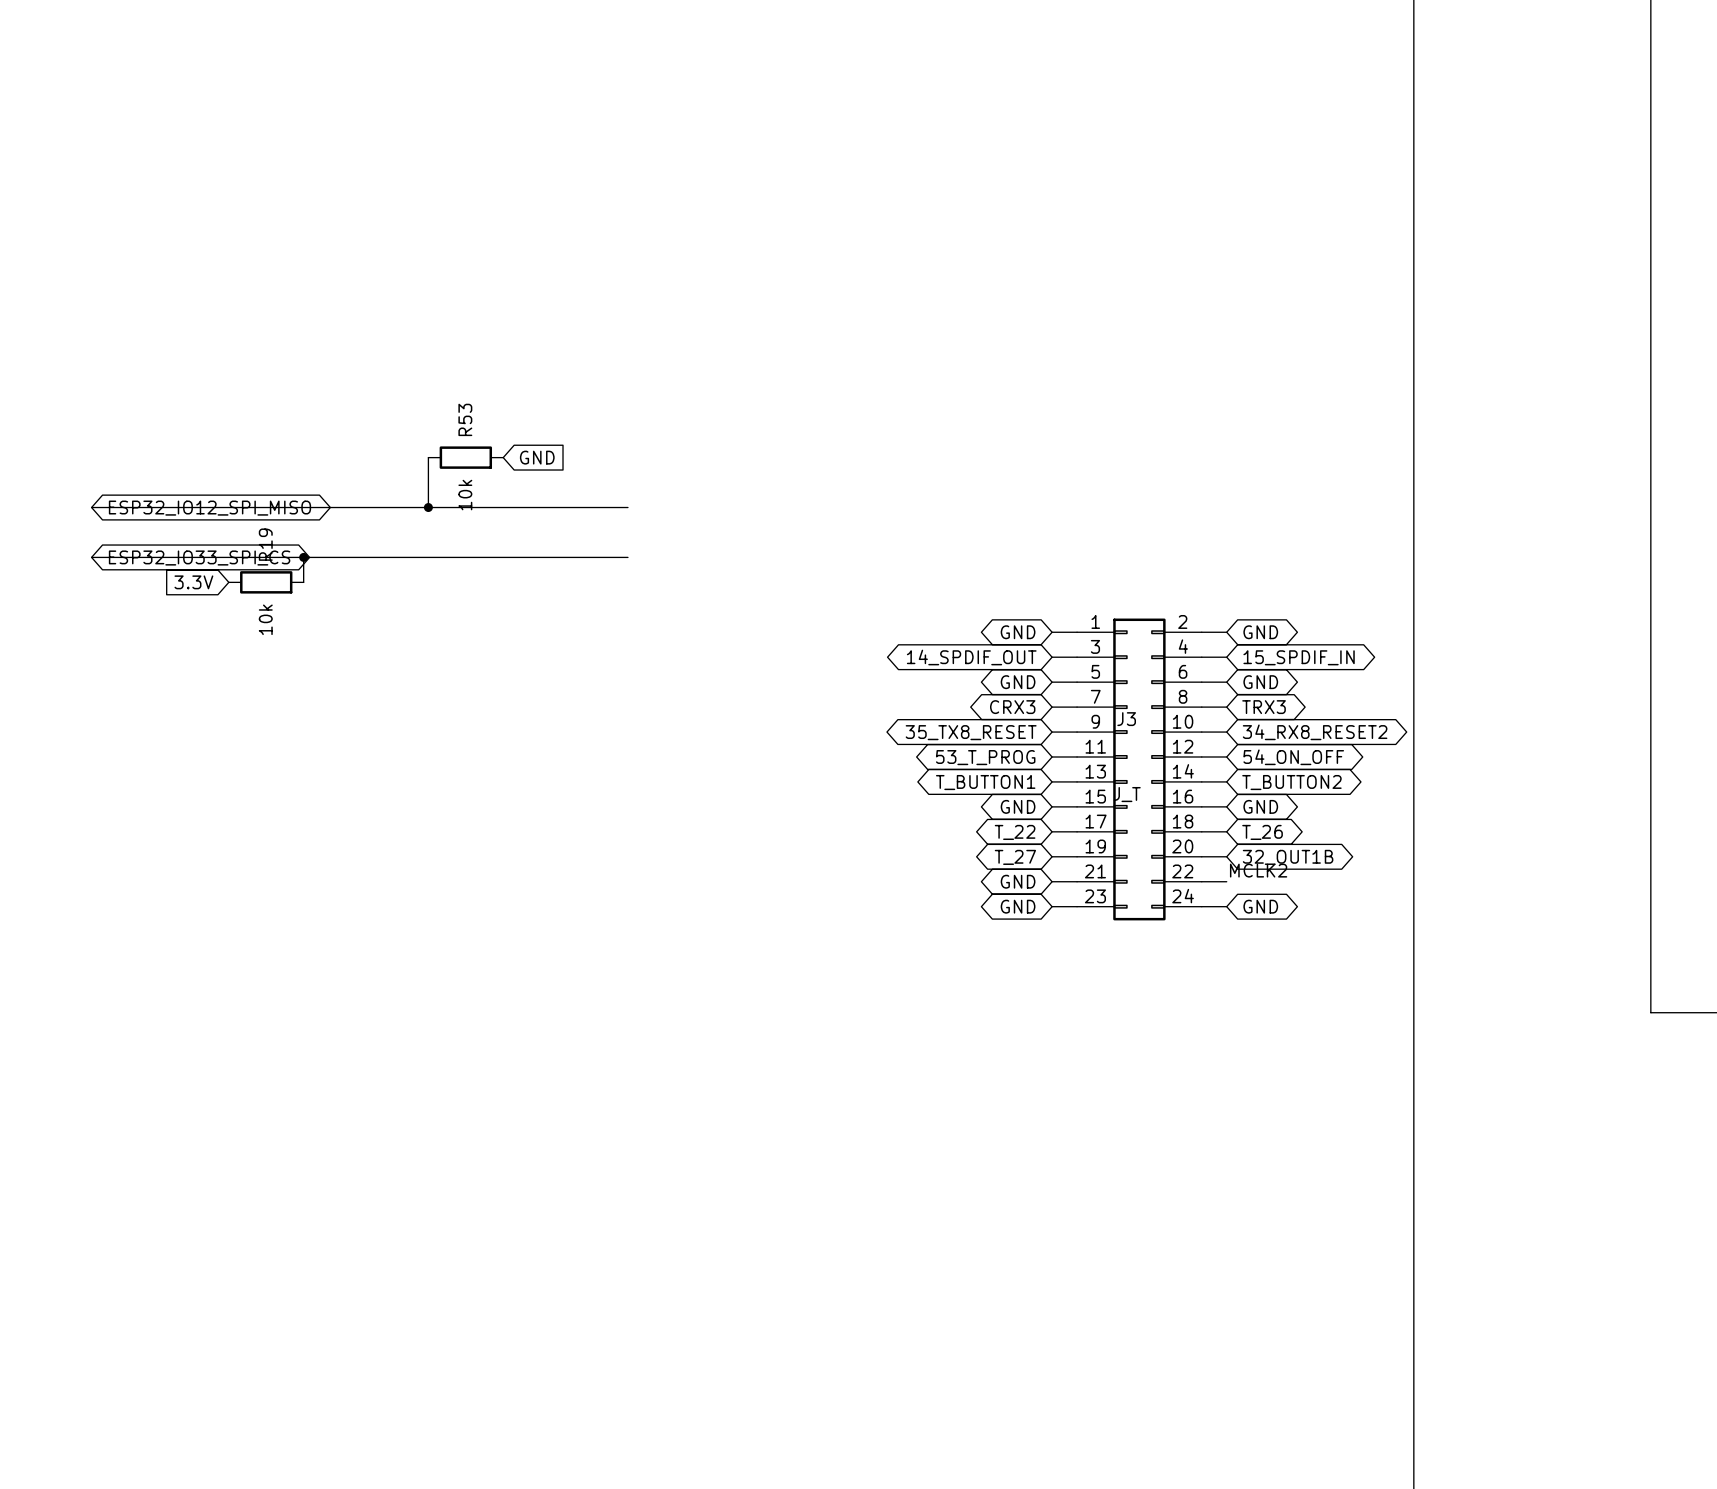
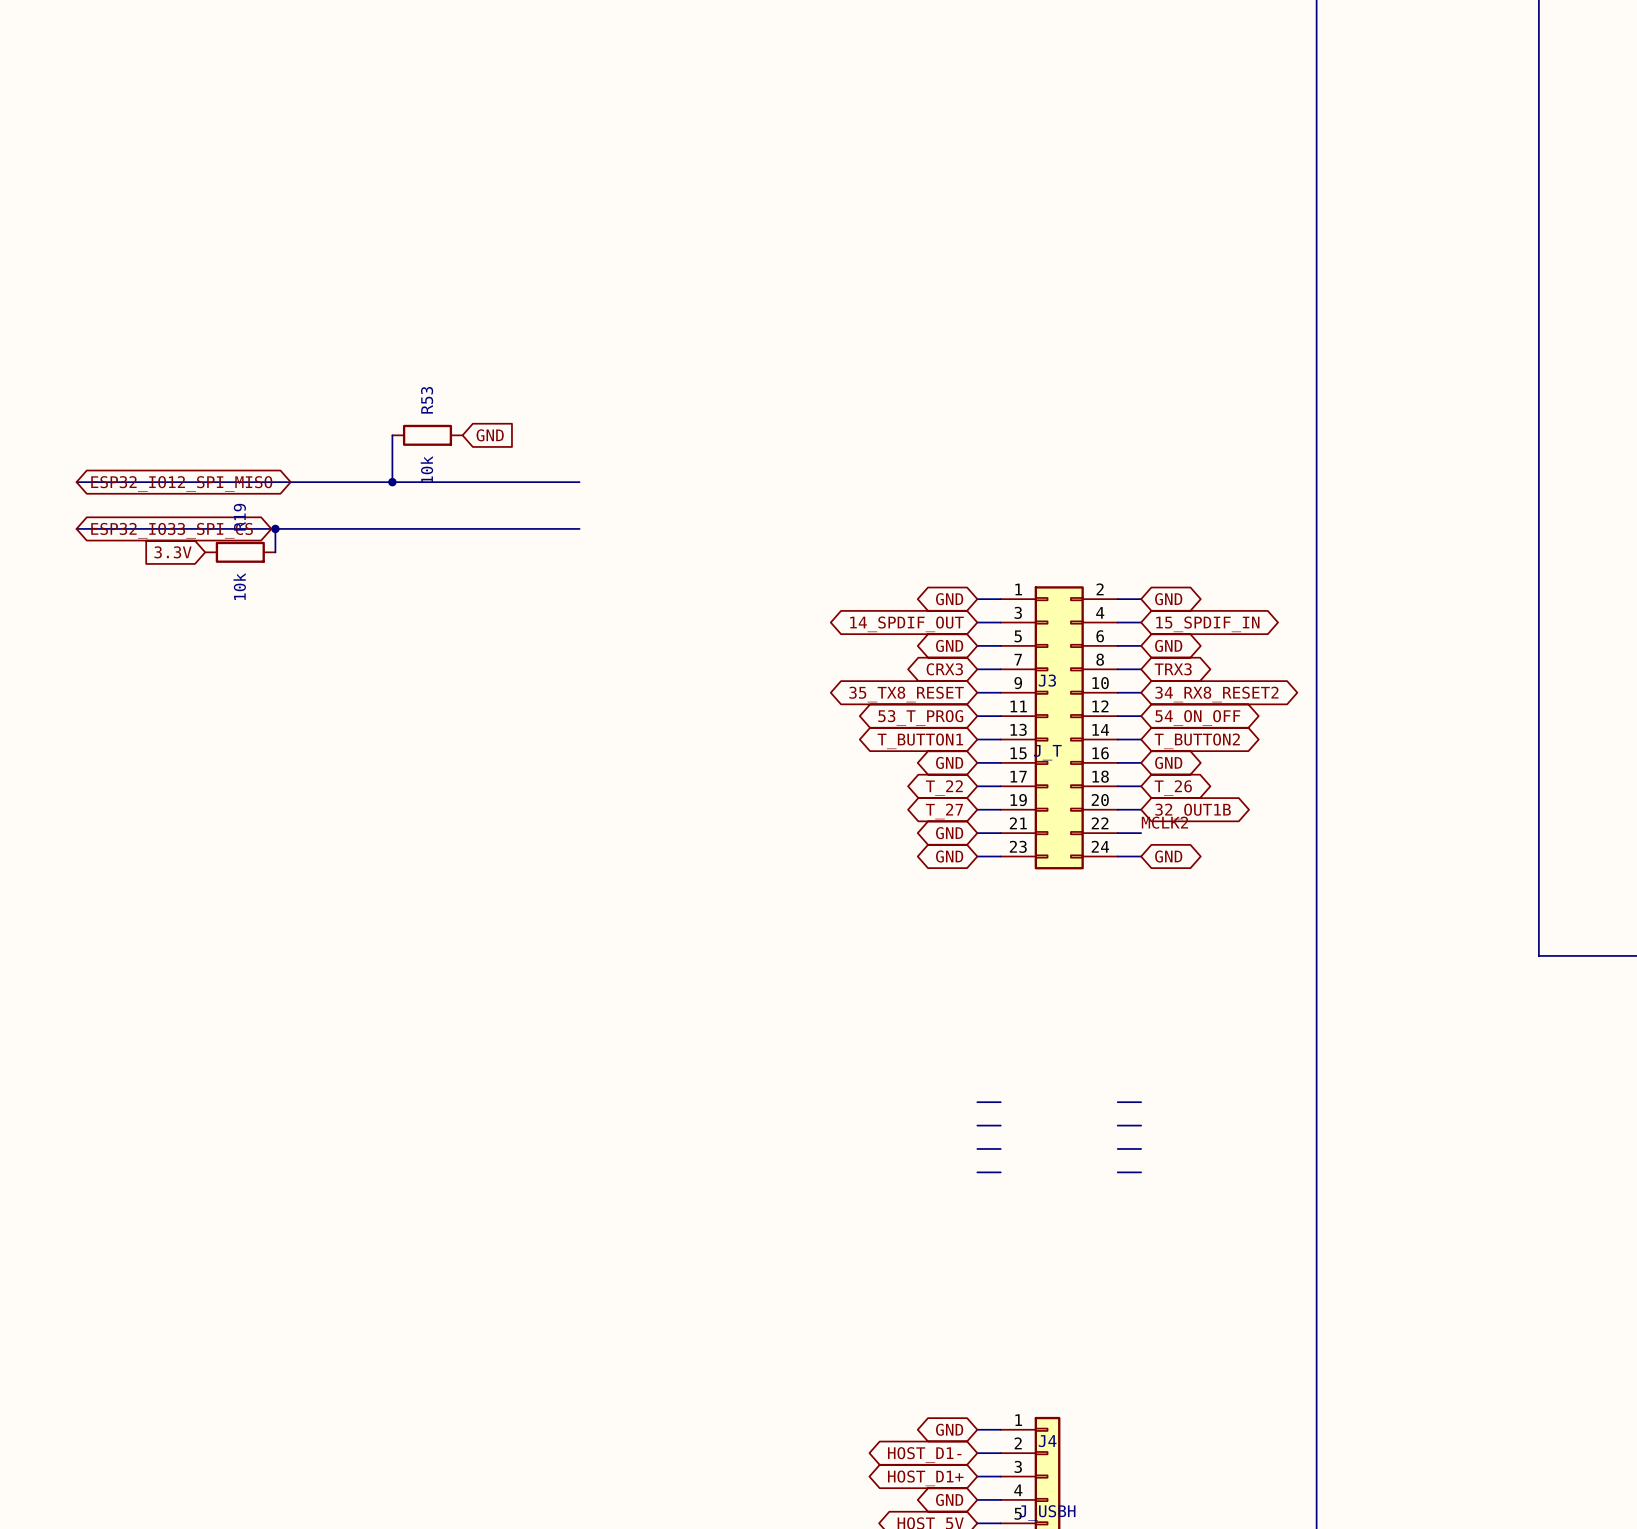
wire: none -> (977, 1102) (1000, 1102)
wire: none -> (1117, 1102) (1141, 1102)
wire: none -> (977, 1125) (1000, 1125)
wire: none -> (1117, 1125) (1141, 1125)
wire: none -> (977, 1148) (1000, 1148)
wire: none -> (1117, 1148) (1141, 1148)
wire: none -> (977, 1172) (1000, 1172)
wire: none -> (1117, 1172) (1141, 1172)

